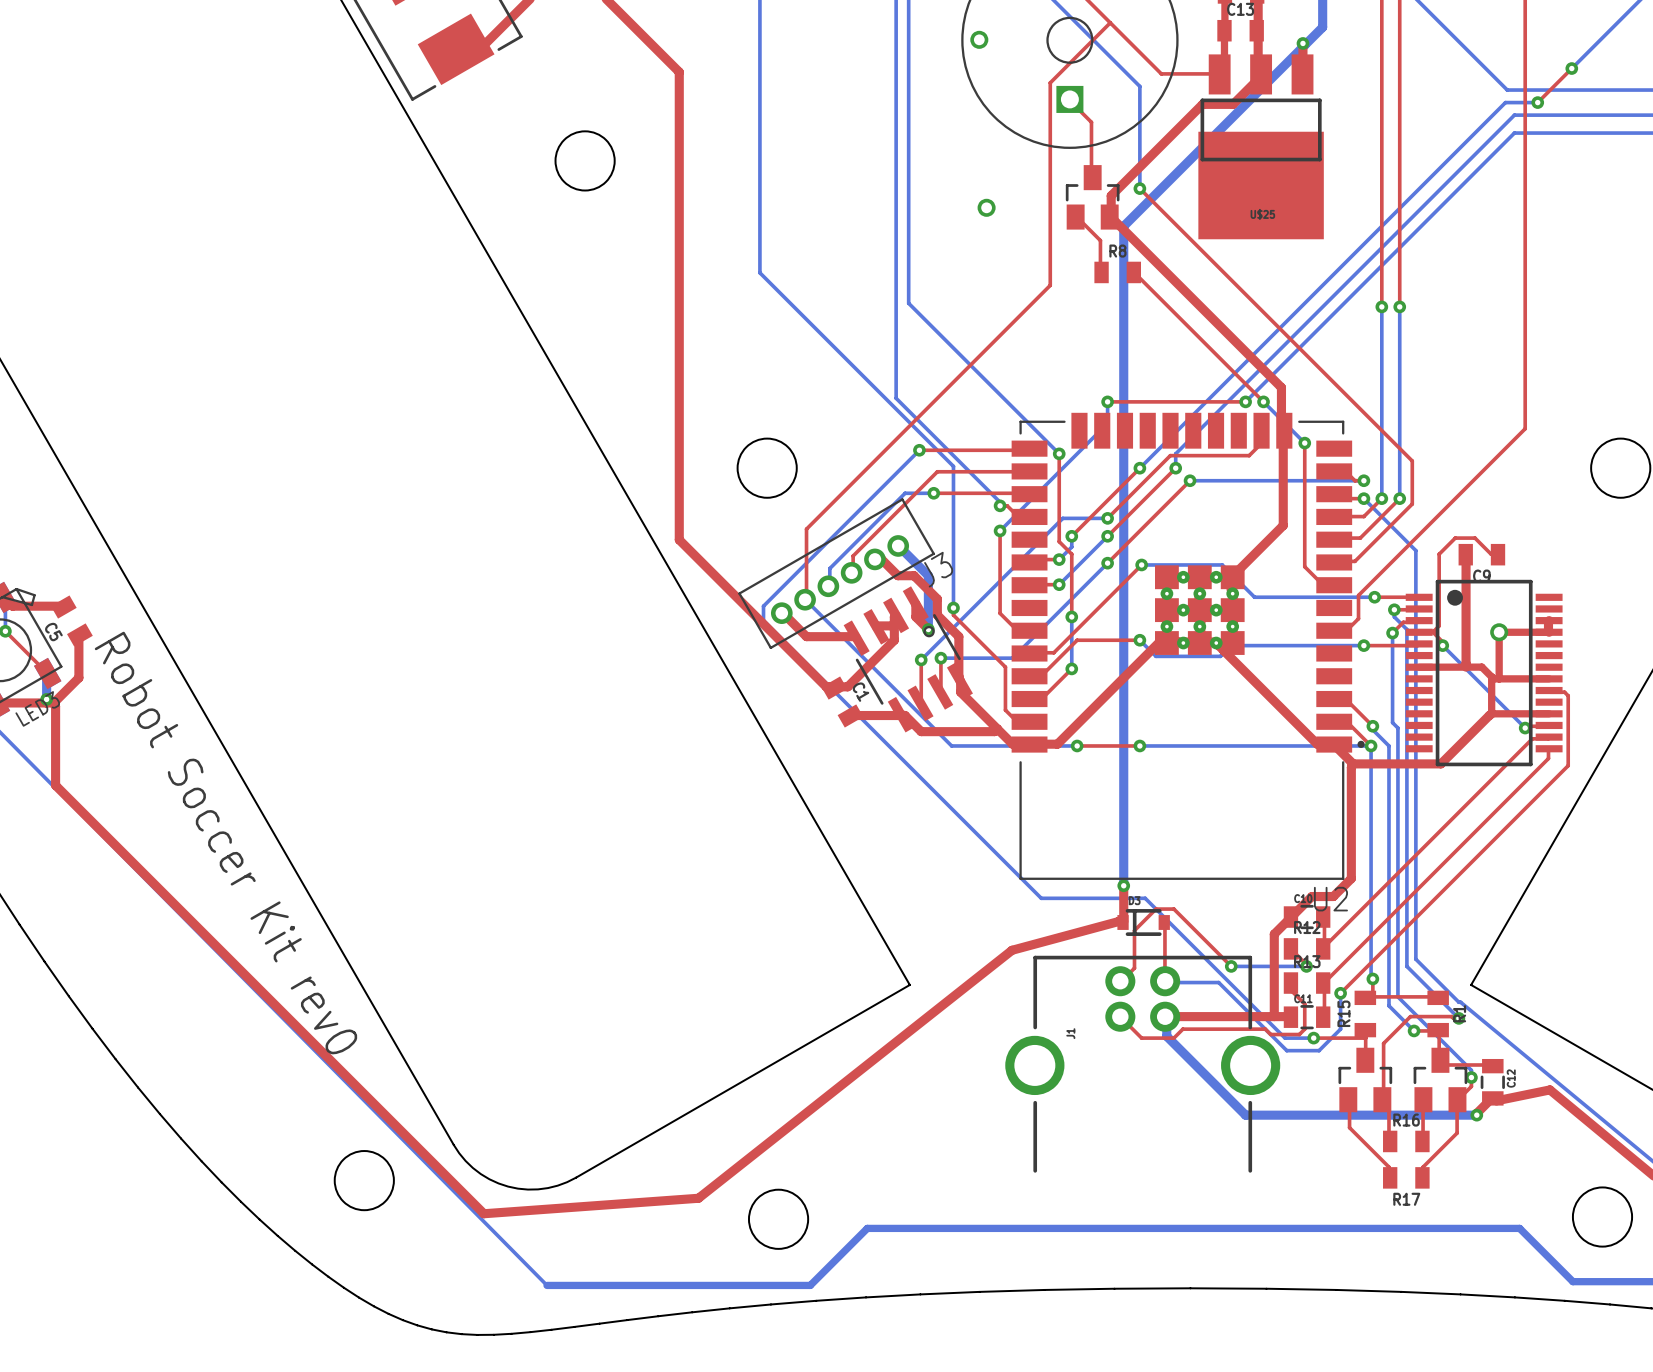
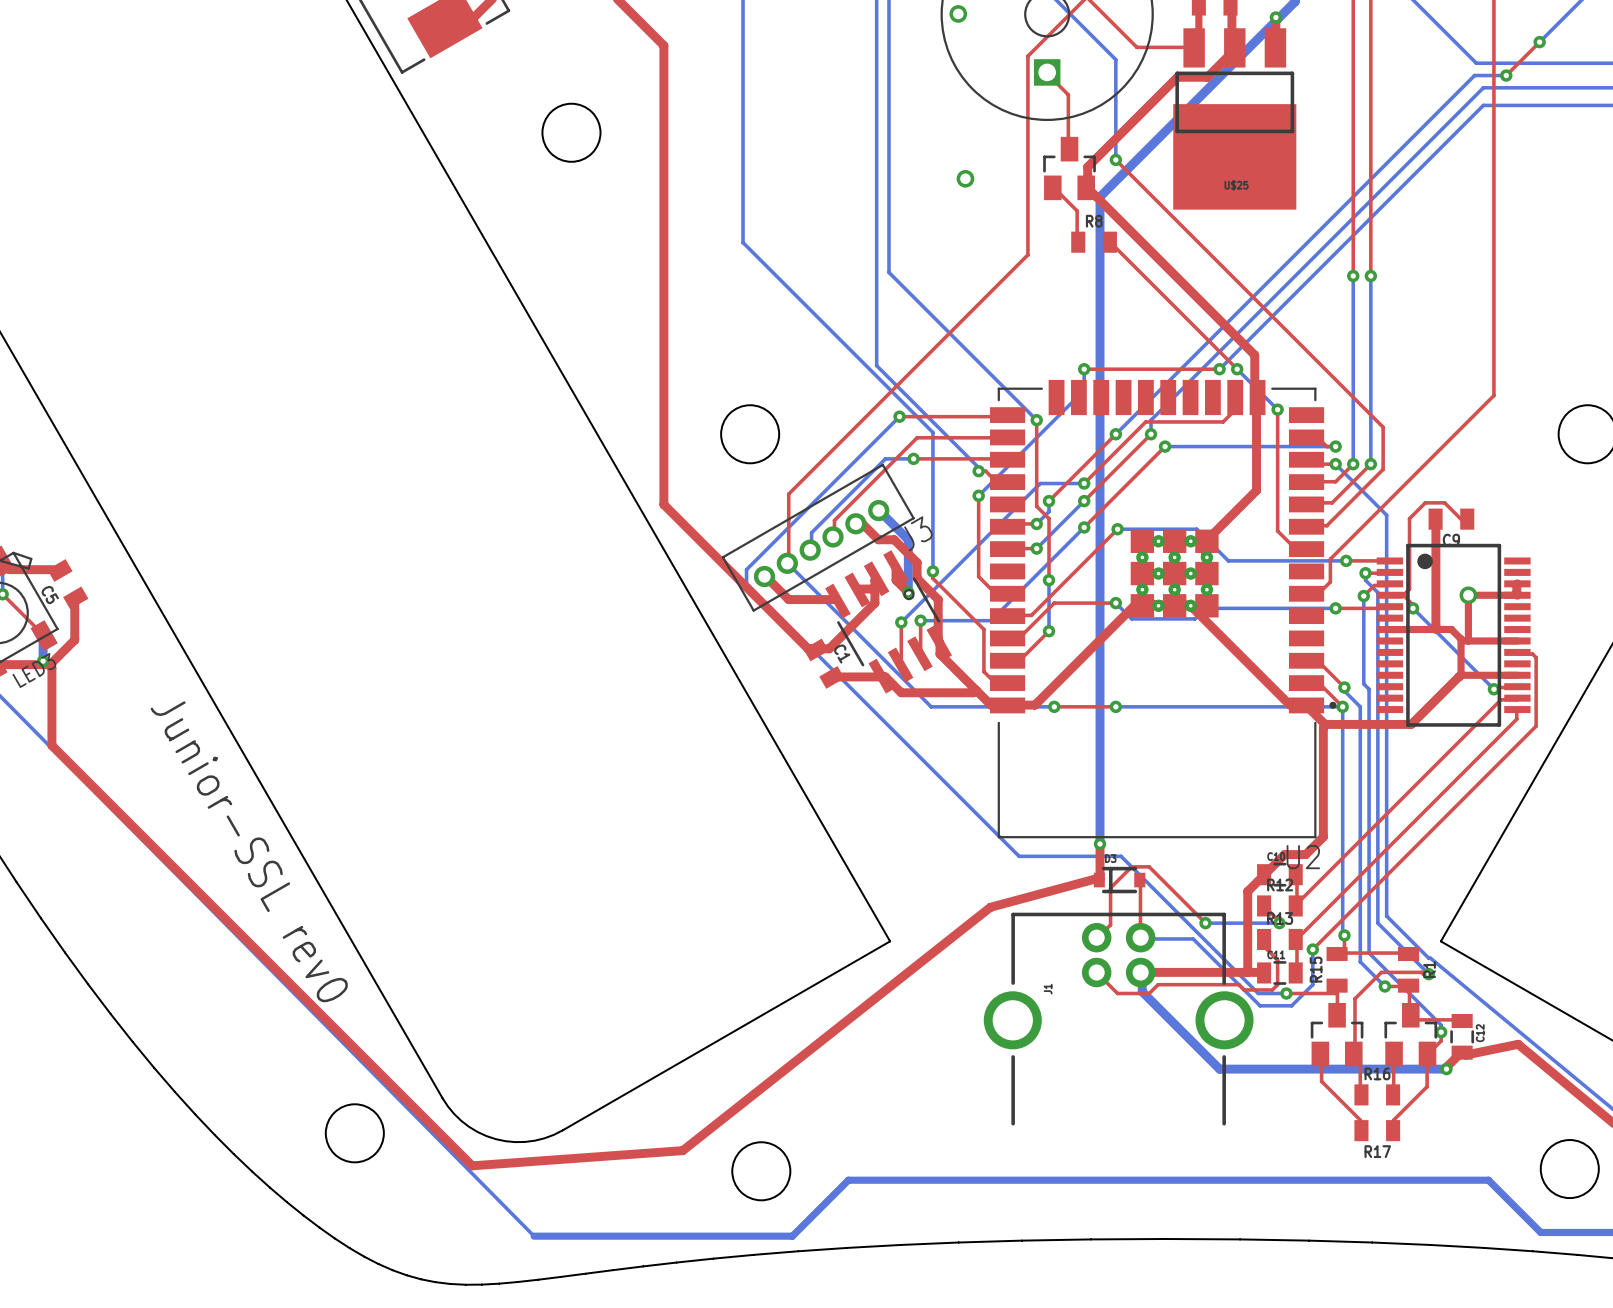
text: Robot Soccer Kit rev0 (225, 843) -> Junior-SSL rev0 (249, 851)

